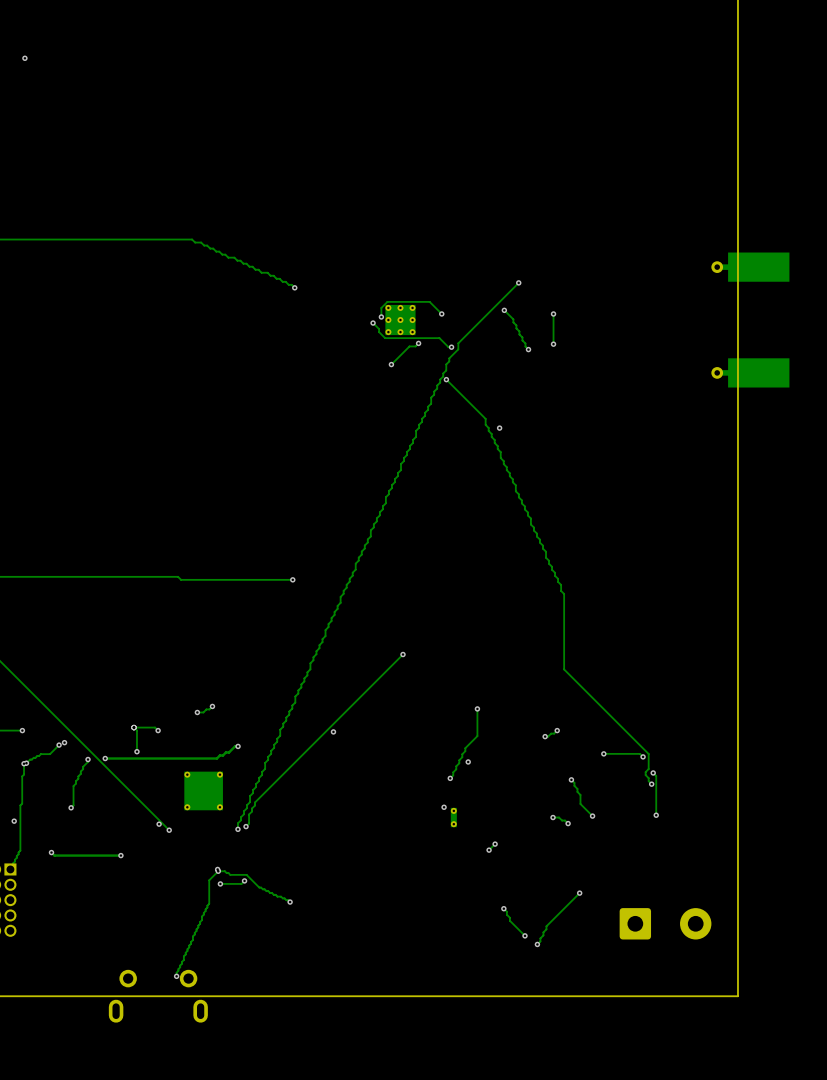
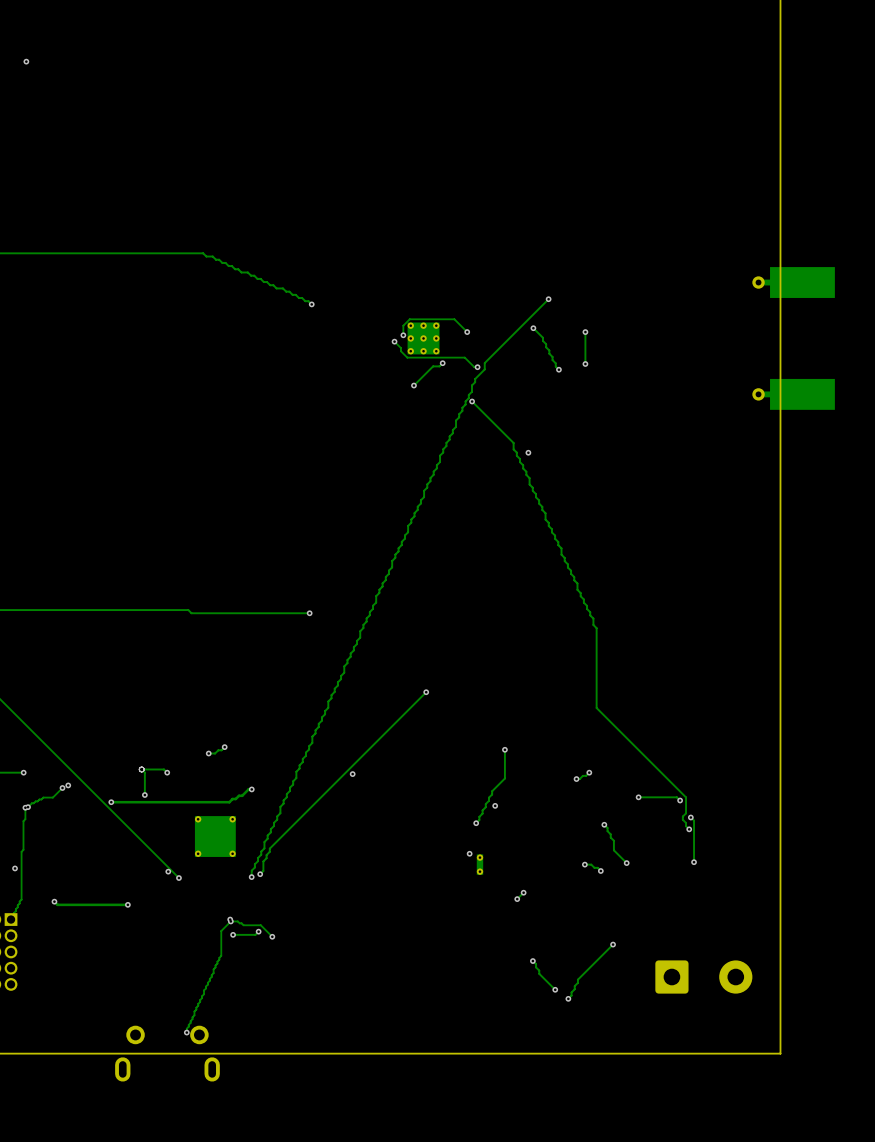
track: (88, 759) (73, 786) (73, 805) (71, 807) -> none
via: (88, 759) -> none
via: (71, 807) -> none
track: (257, 885) (290, 902) -> none
via position: (290, 902) -> (272, 936)

